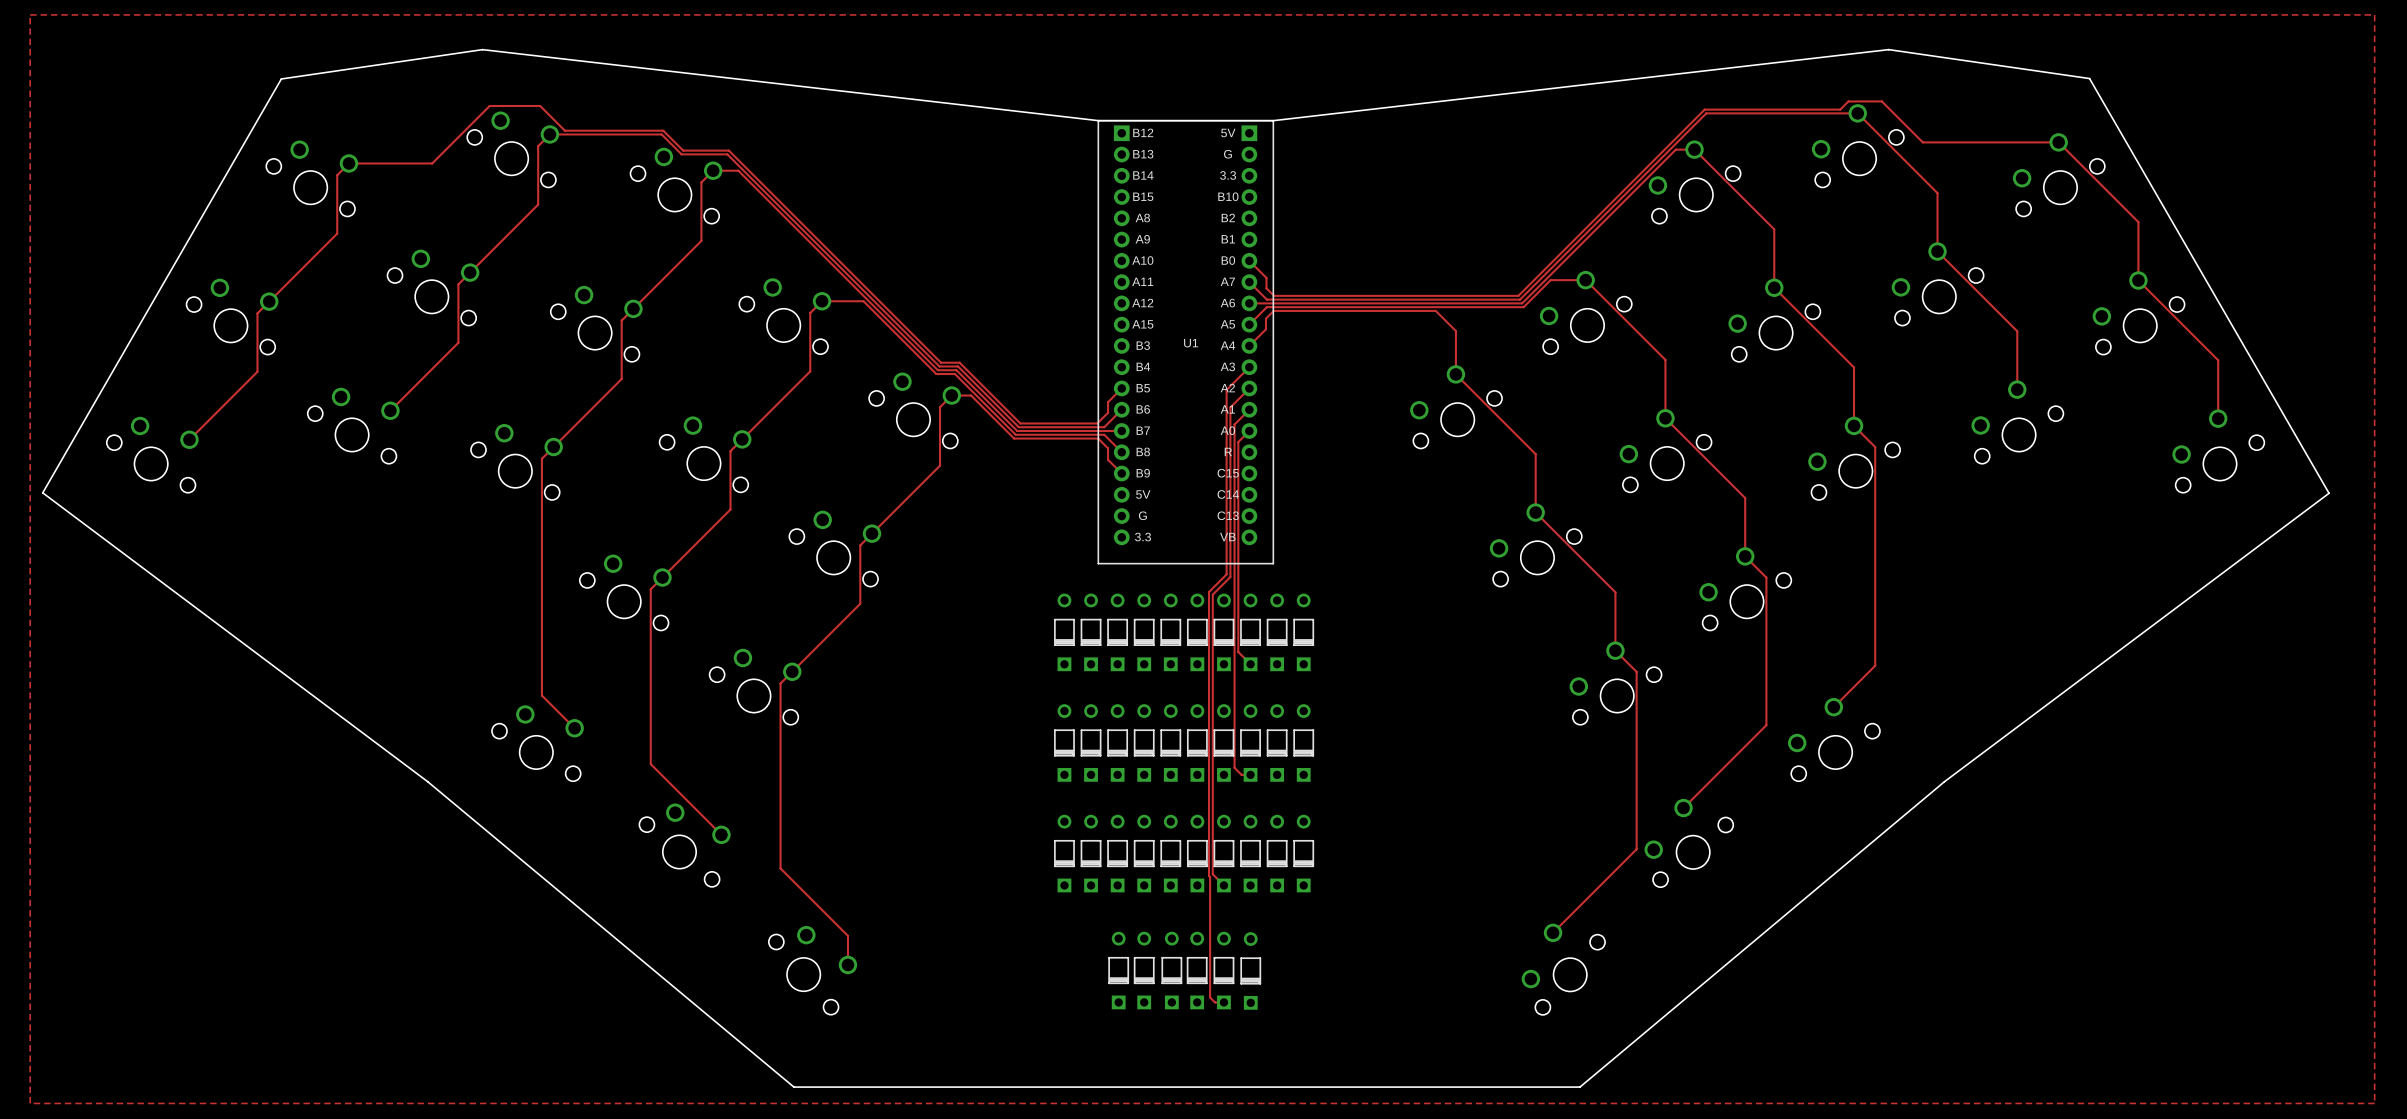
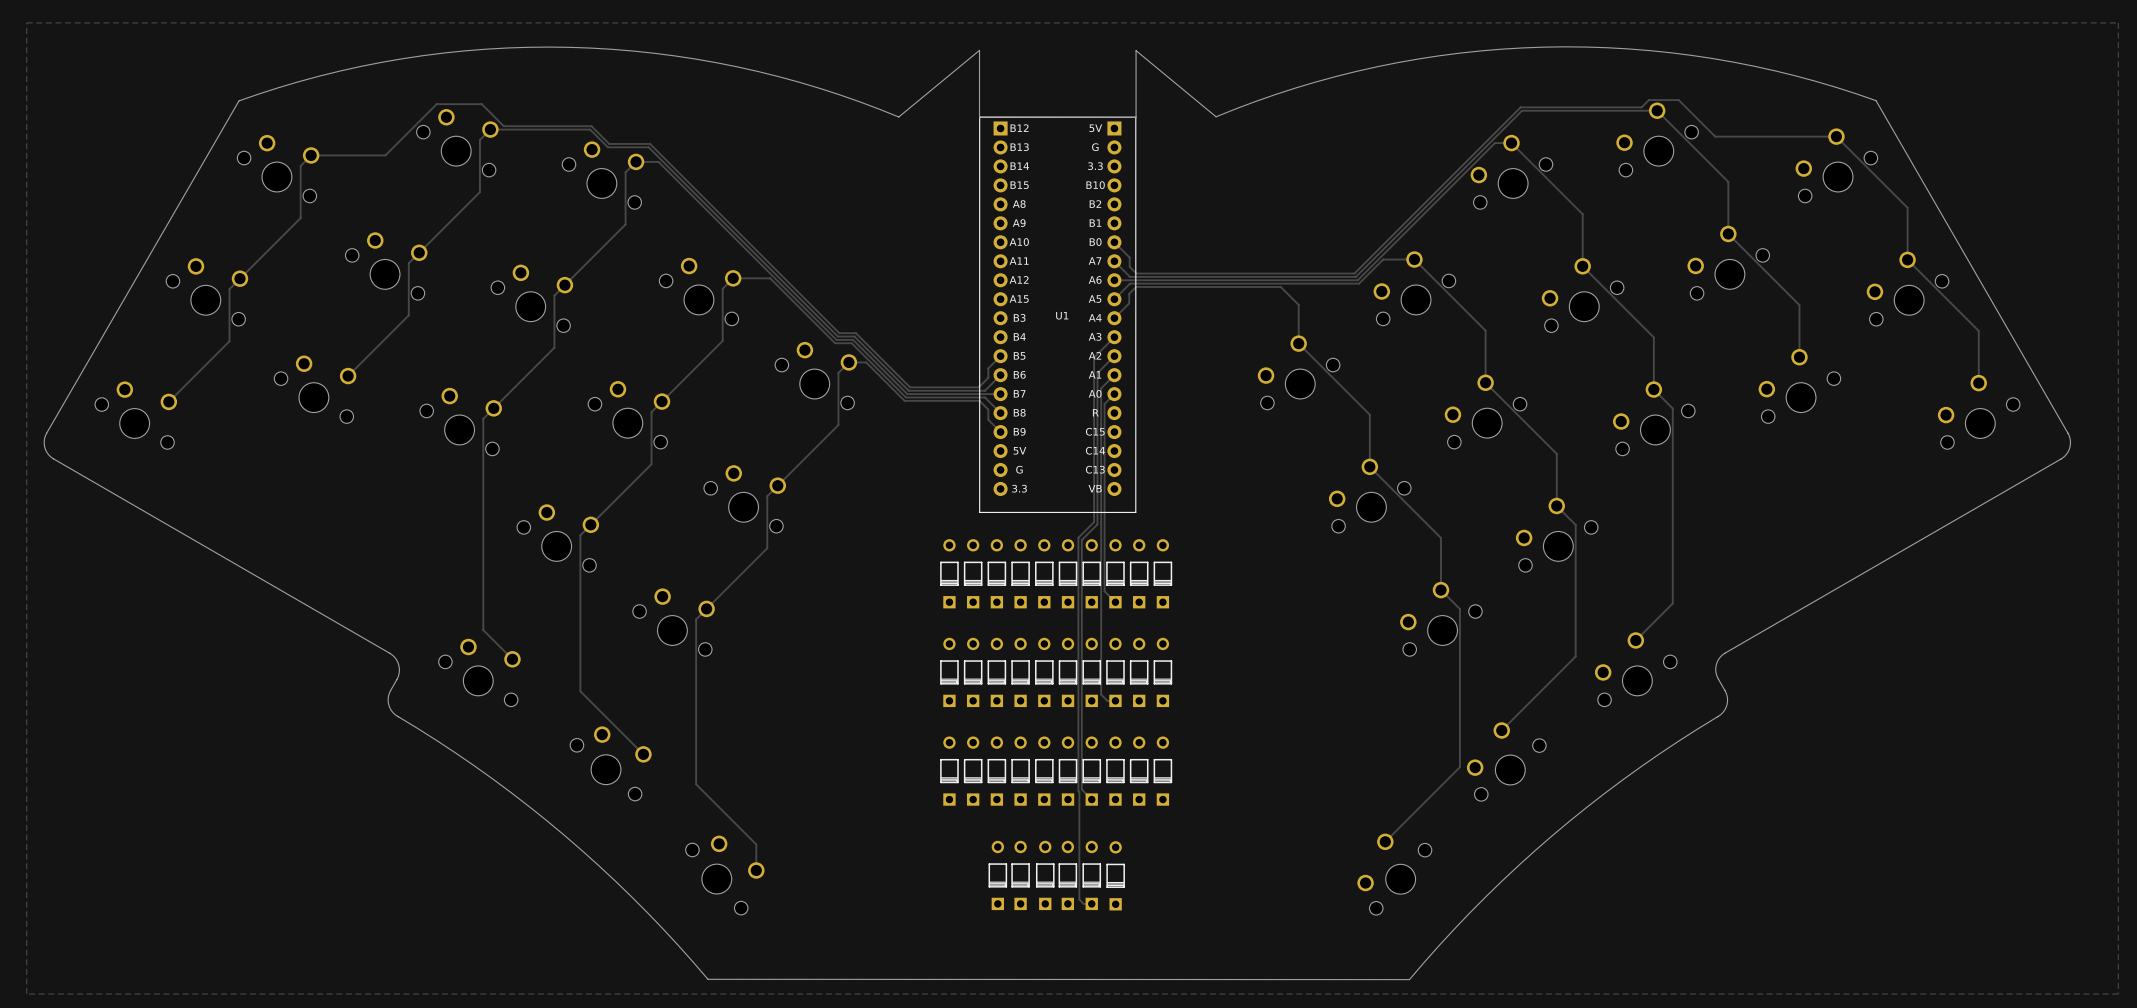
board edge: (482, 49) (1098, 120) (1273, 120) (1888, 49) (2089, 78) (2329, 493) (1944, 781) (1579, 1087) (793, 1087) (427, 781) (42, 492) (281, 78) (482, 49) -> (979, 50) (898, 116) (819, 88) (737, 66) (654, 53) (570, 47) (486, 49) (402, 58) (319, 76) (238, 100) (46, 433) (44, 441) (45, 449) (53, 458) (391, 654) (396, 660) (399, 670) (388, 697) (389, 707) (393, 713) (492, 779) (564, 835) (631, 896) (708, 979) (1409, 979) (1470, 912) (1552, 835) (1623, 779) (1722, 713) (1726, 704) (1727, 697) (1717, 677) (1715, 669) (1717, 660) (1723, 654) (2061, 458) (2069, 449) (2070, 440) (2067, 433) (1876, 100) (1795, 75) (1712, 58) (1628, 48) (1544, 47) (1460, 53) (1377, 66) (1295, 88) (1216, 116) (1136, 50) (1136, 117) (979, 116) (979, 50)

